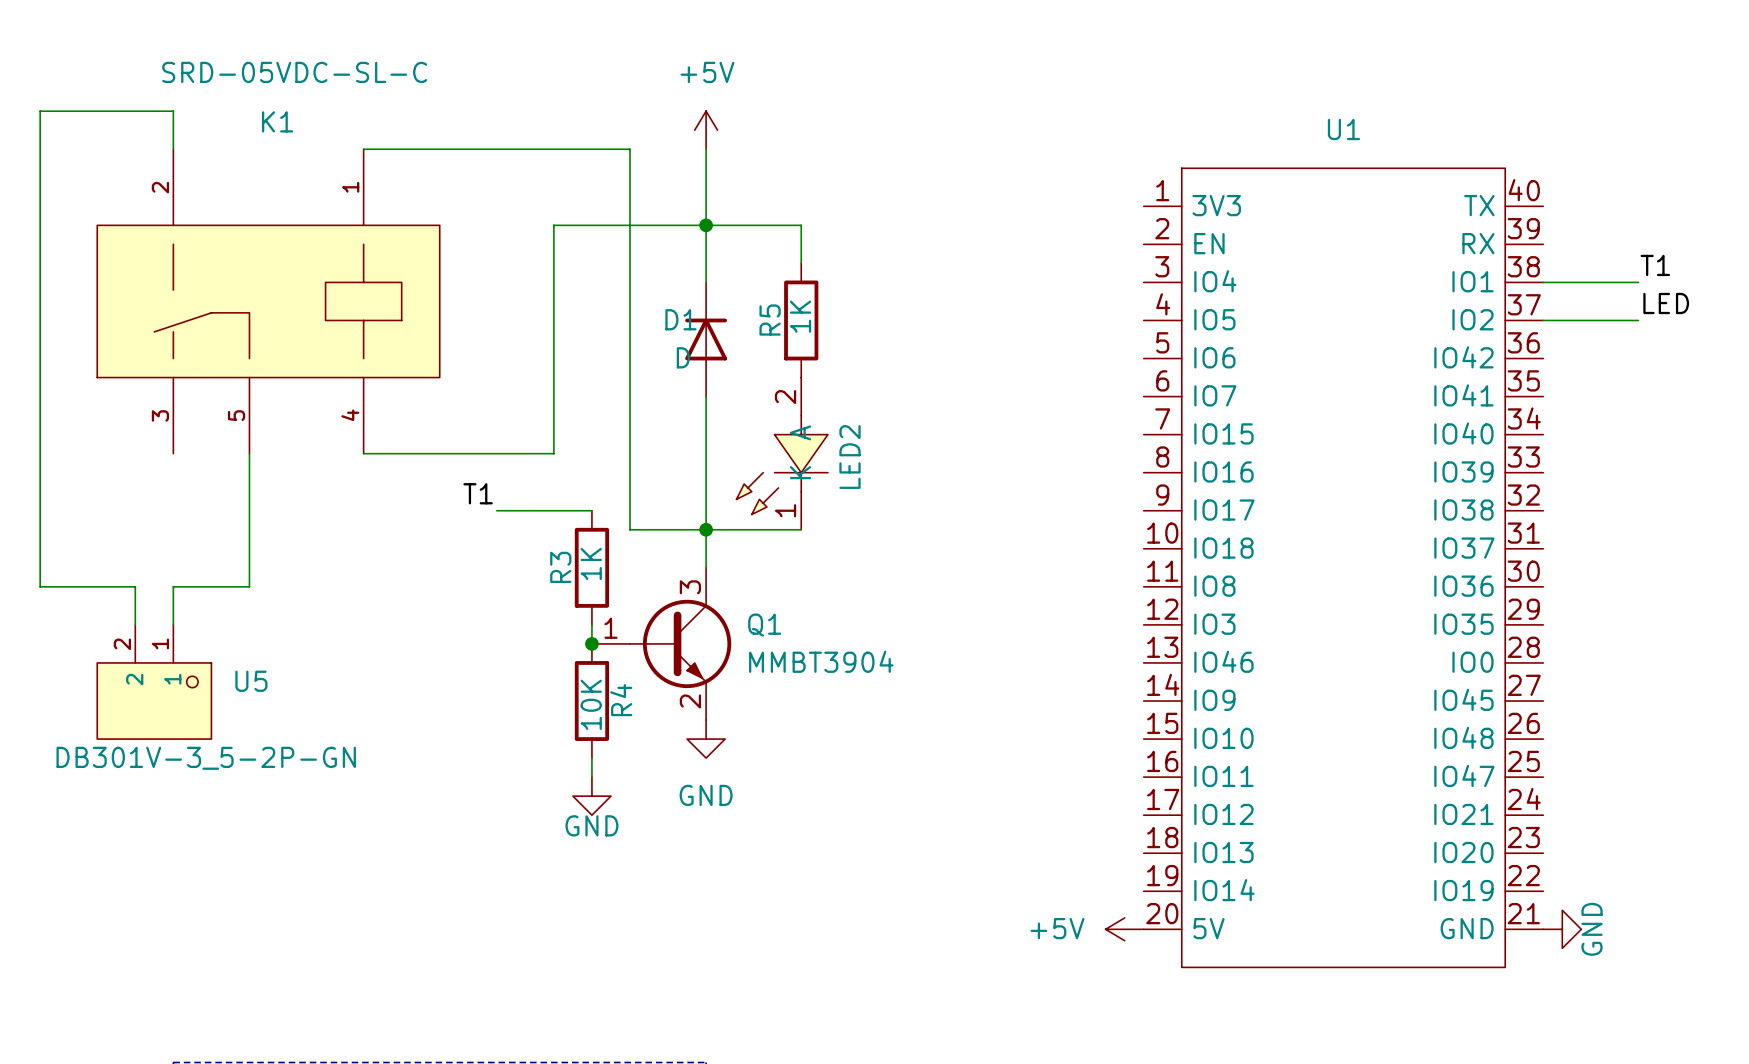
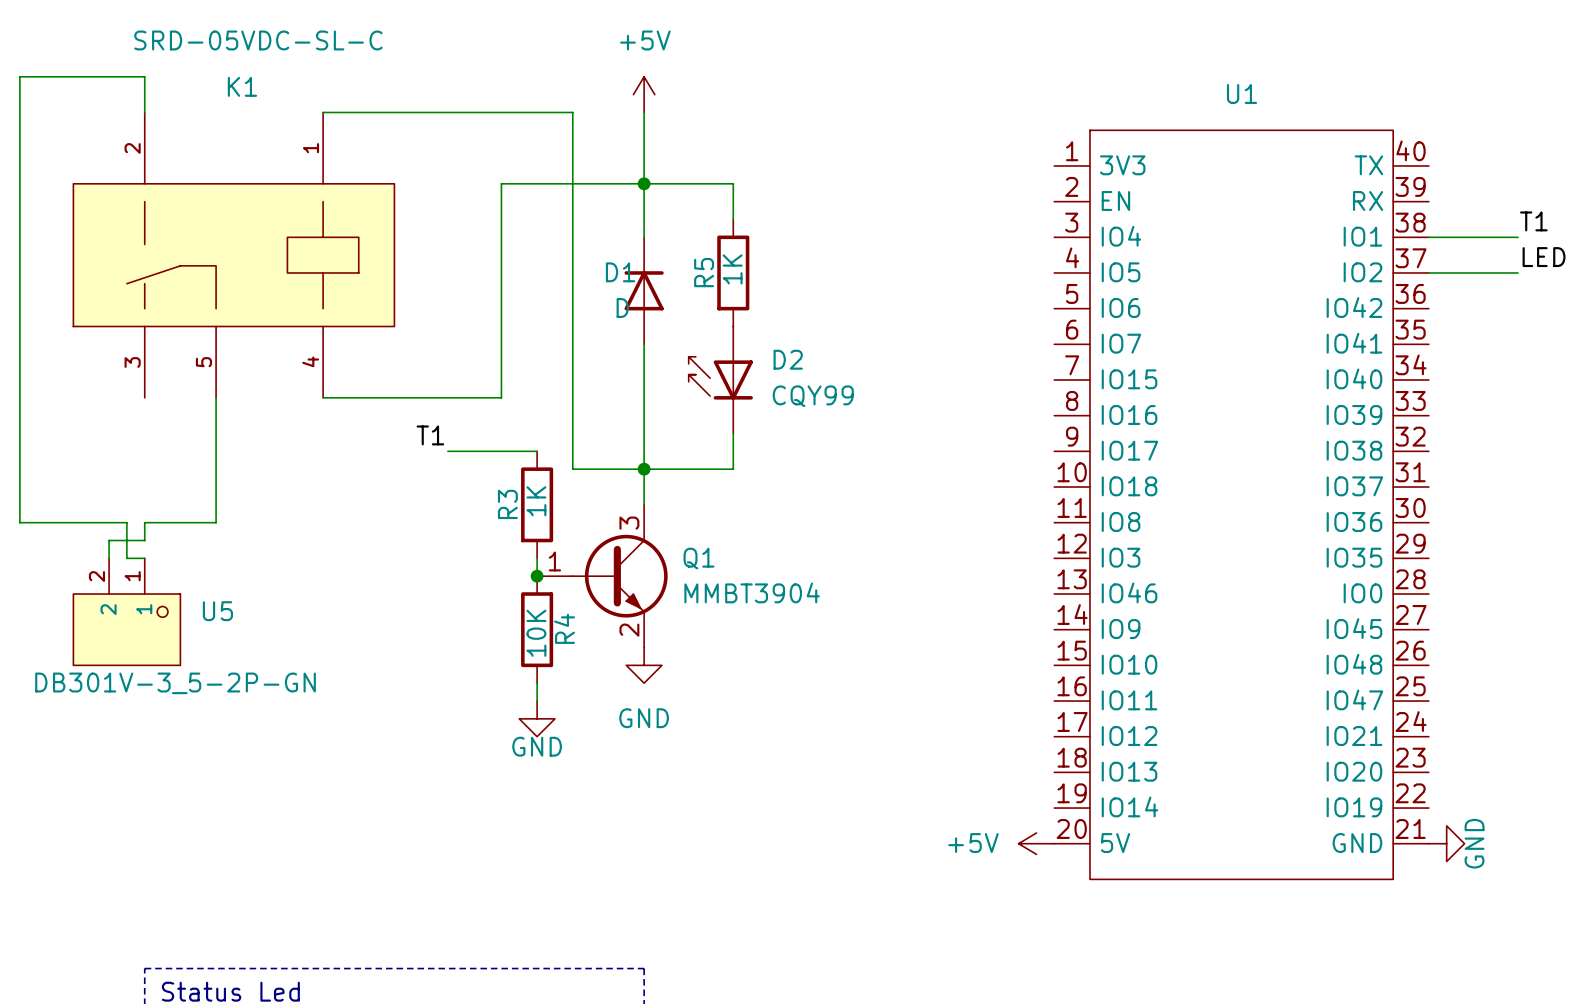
D2: none -> CQY99 (720, 380)
LED2: (782, 453) -> none
wire: (135, 586) (135, 605) -> (109, 522) (126, 522) (126, 558) (144, 558)
wire: (173, 605) (173, 624) -> (144, 540) (109, 540)

